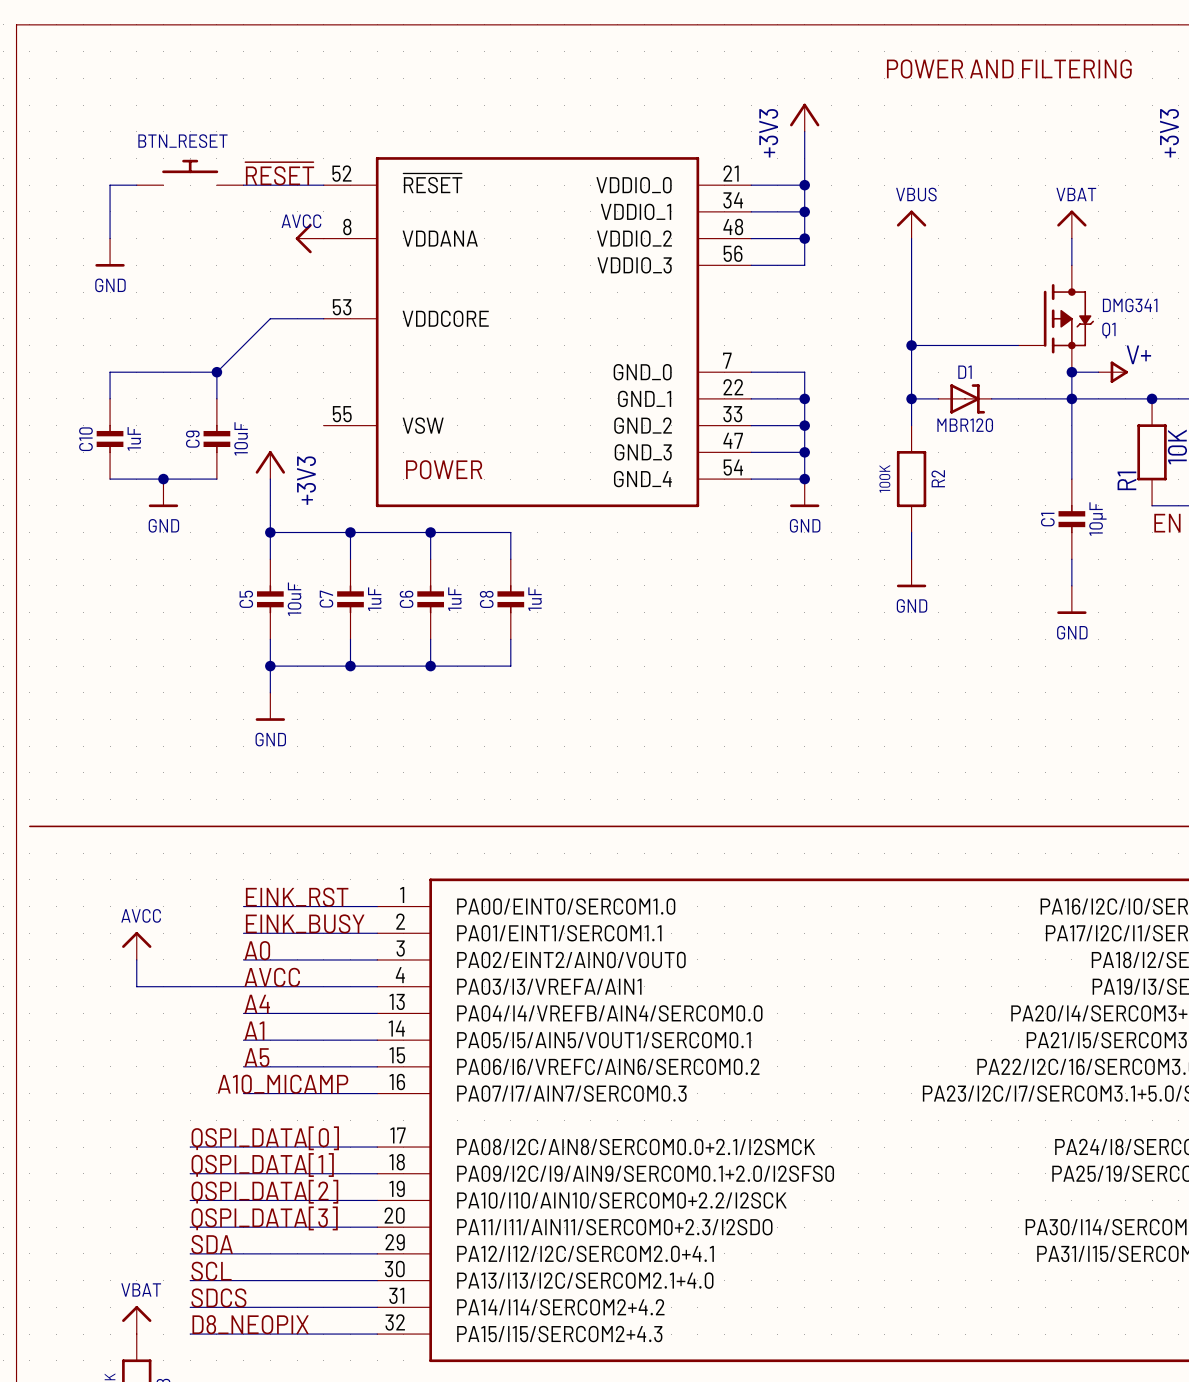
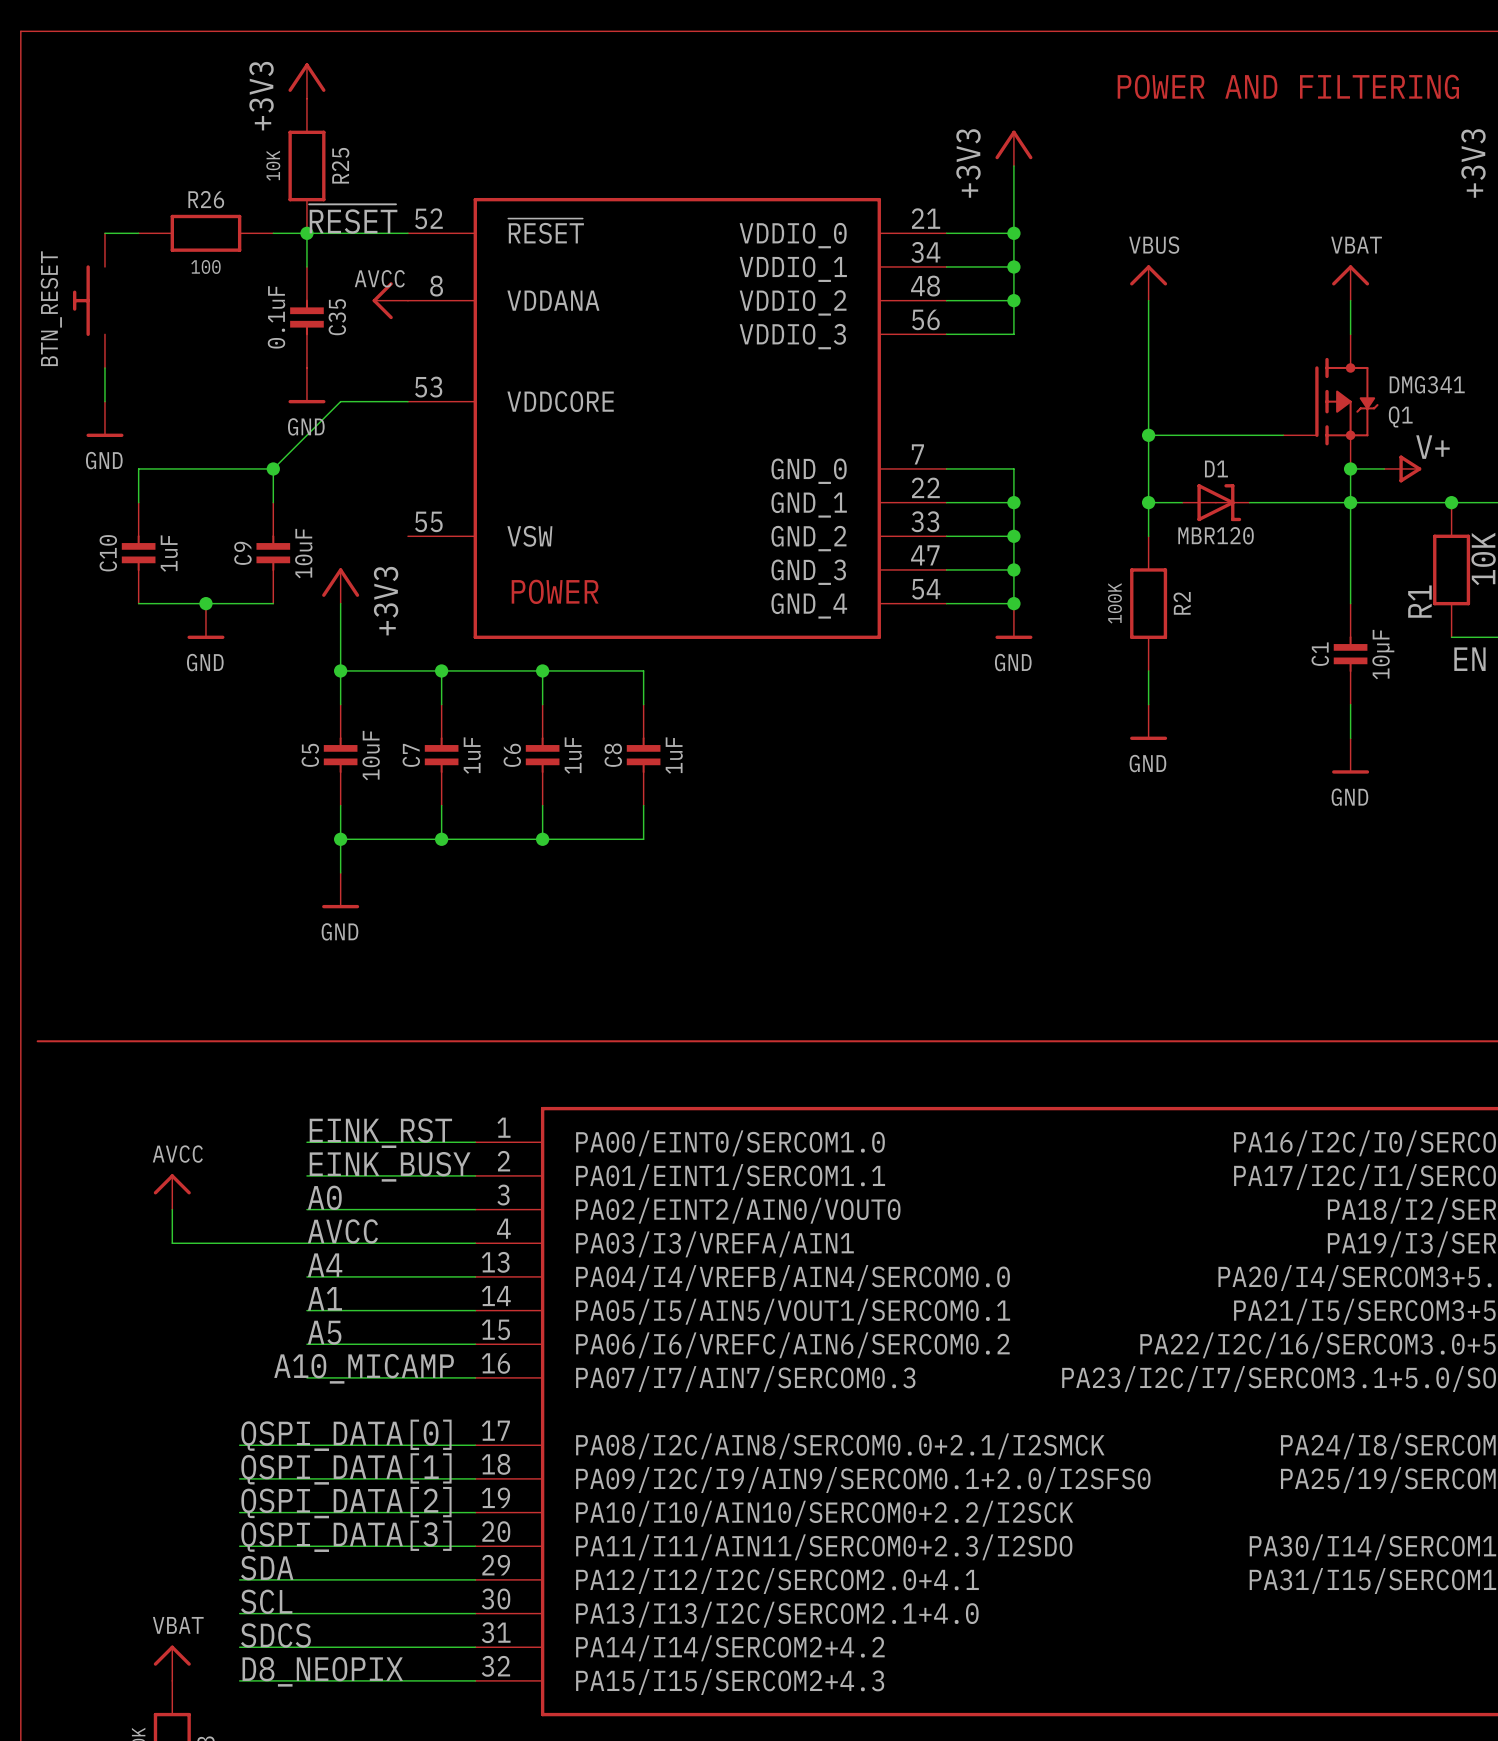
power symbol: none -> +3V3 (306, 80)
R25: none -> 10K (306, 165)
BTN_RESET rotation: 0° (190, 166) -> 90° counterclockwise (81, 300)
BTN_RESET position: (190, 172) -> (88, 300)
wire: none -> (104, 233) (138, 233)
wire: (136, 185) (110, 185) (110, 238) -> none
R26: none -> 100 (205, 233)
wire: none -> (273, 233) (306, 233) (306, 266)
junction: none -> (306, 233)
C35: none -> 0.1uF (306, 317)
power symbol: GND (110, 252) -> none
wire: none -> (104, 367) (104, 401)
power symbol: none -> GND (306, 385)
power symbol: none -> GND (104, 419)

